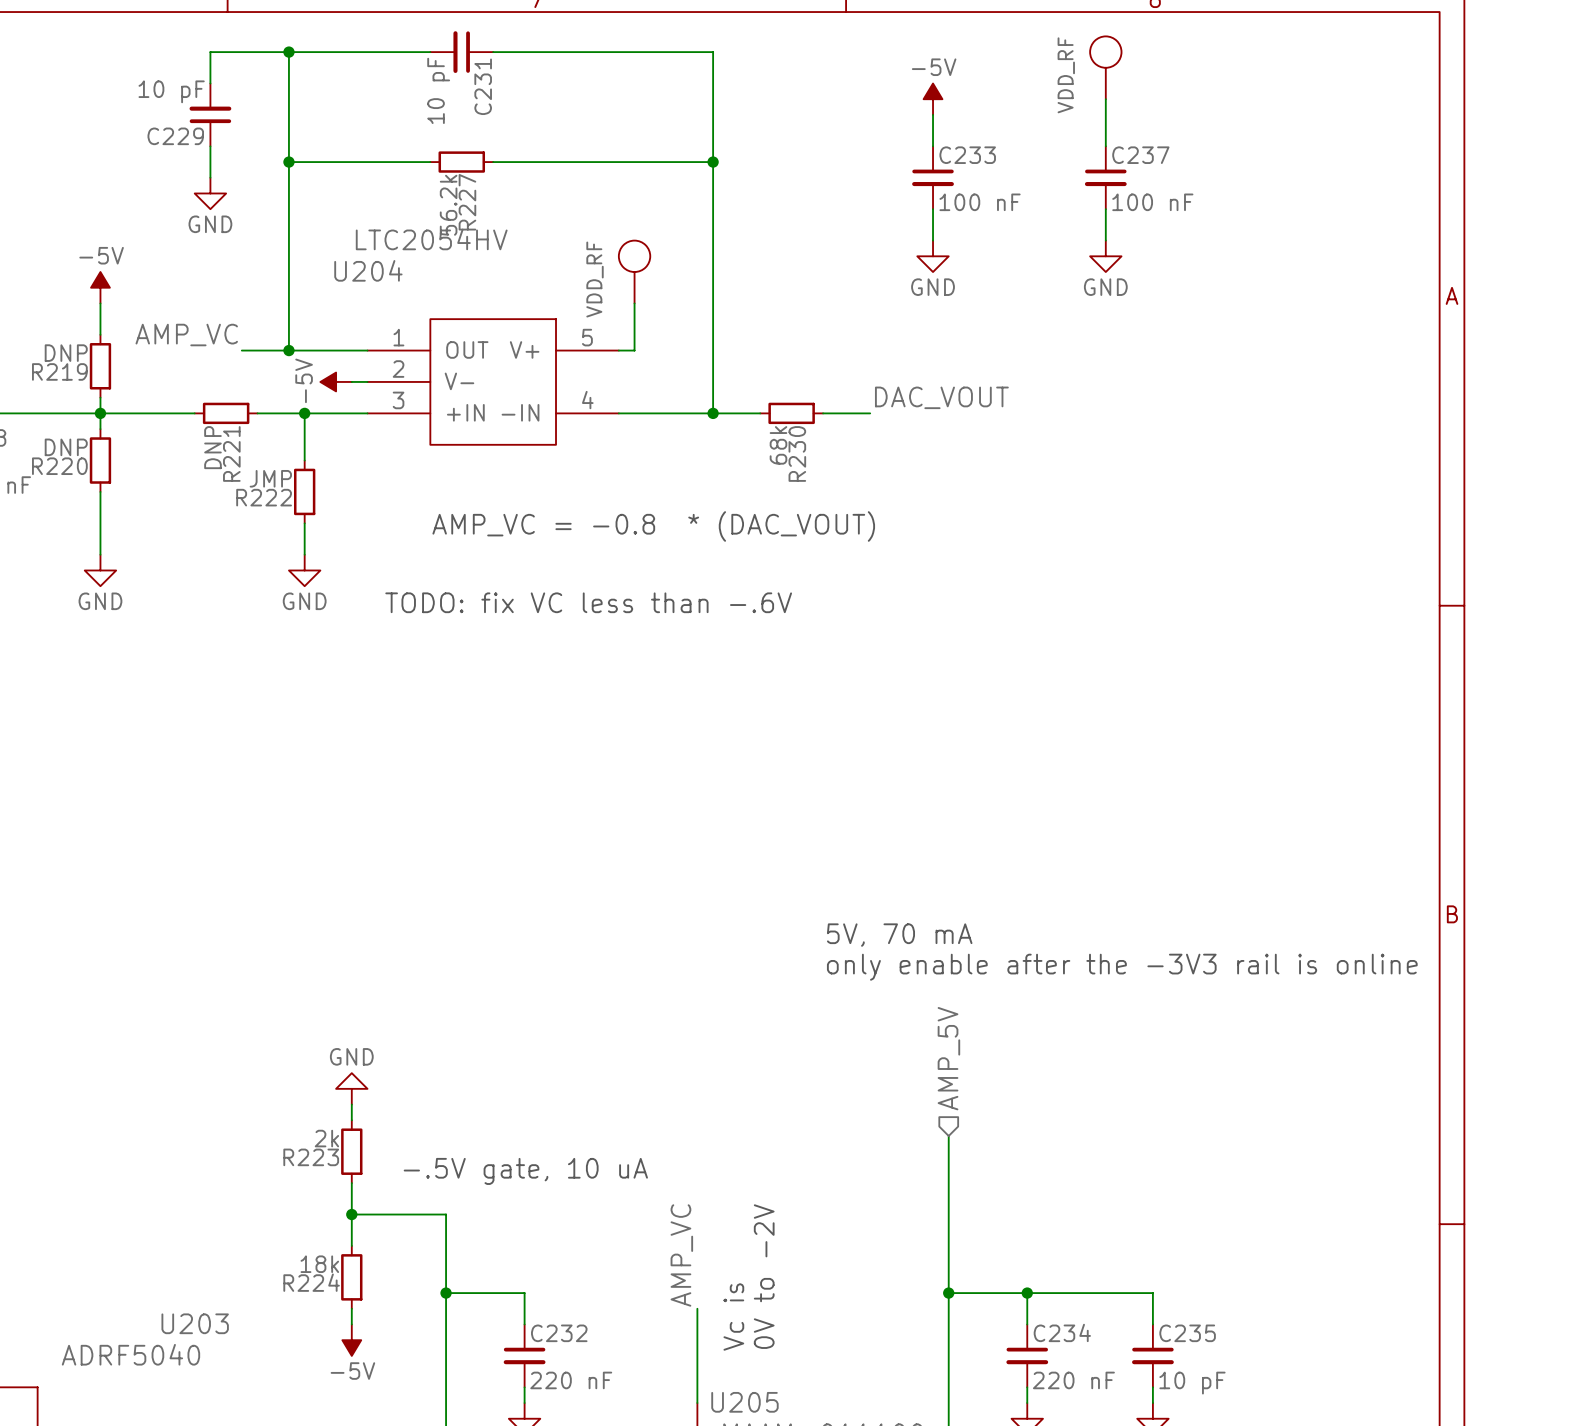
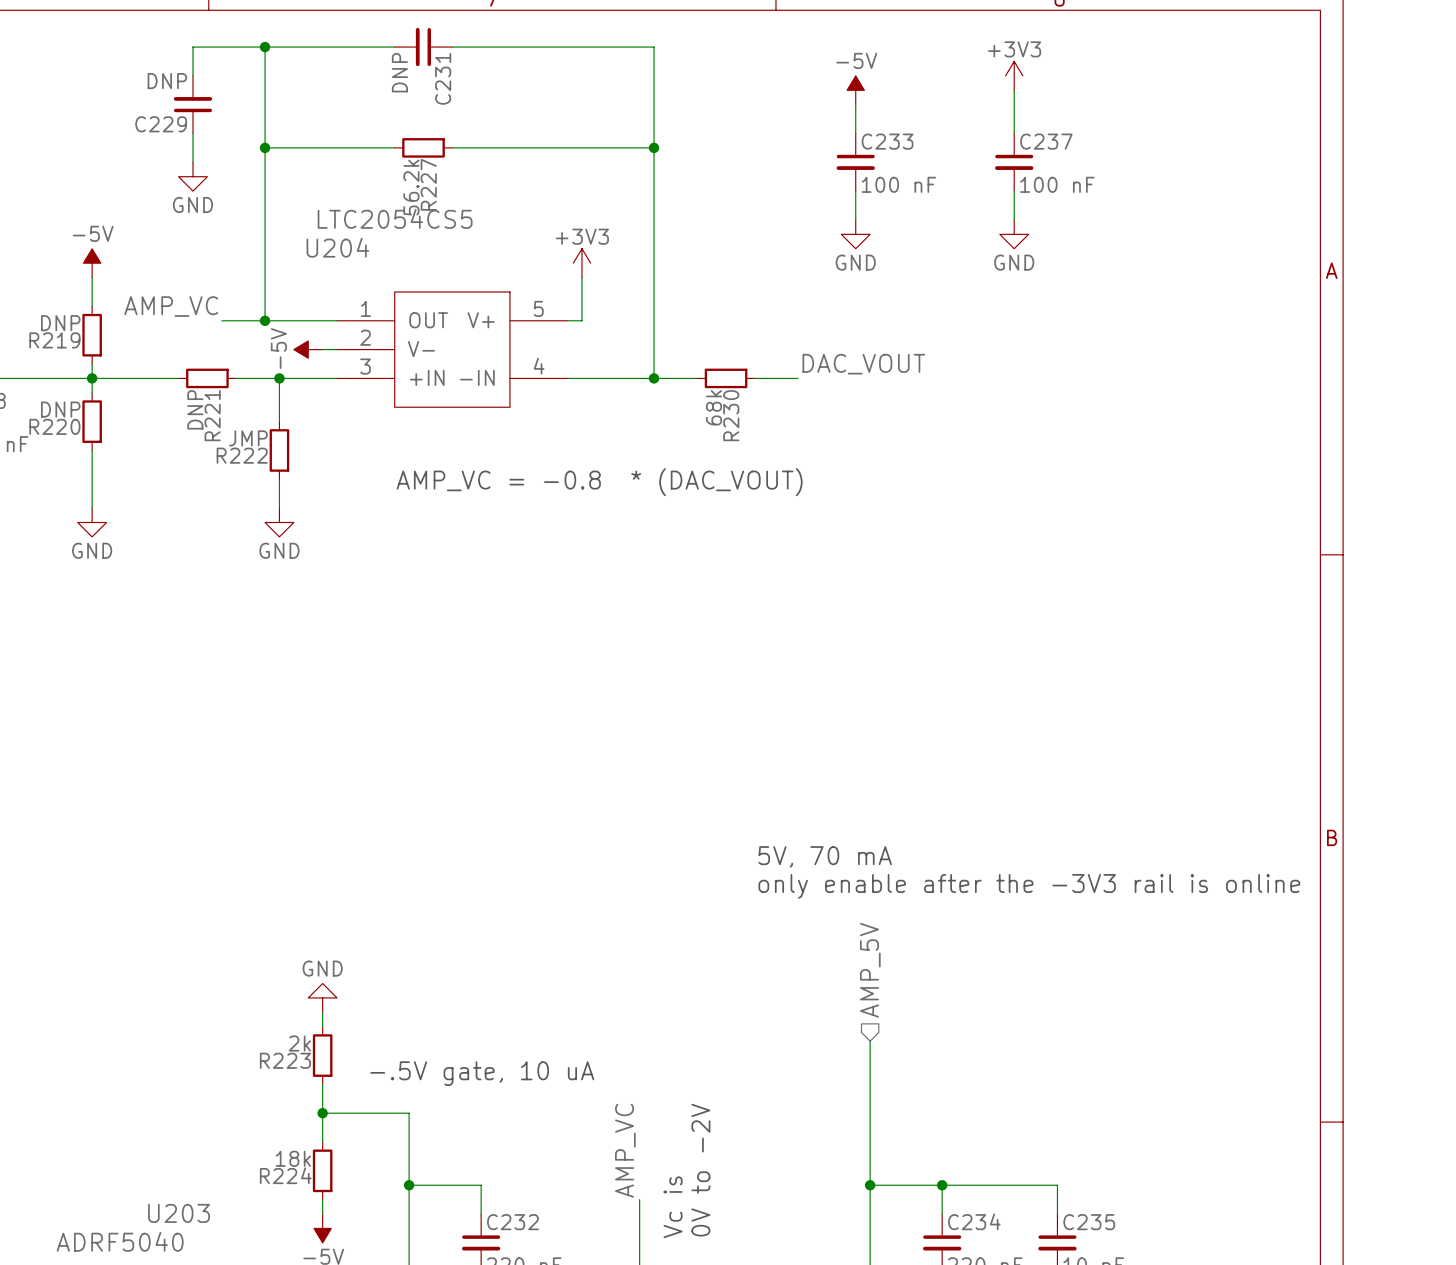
power symbol: VDD_RF (1105, 67) -> none
power symbol: none -> +3V3 (1014, 75)
C231 value: 10 pF (438, 90) -> DNP (399, 72)
C229 value: 10 pF (171, 91) -> DNP (167, 81)
U204 value: LTC2054HV (431, 239) -> LTC2054CS5 (395, 218)
power symbol: VDD_RF (634, 272) -> none
power symbol: none -> +3V3 (581, 263)
text: TODO: fix VC less than -.6V (588, 602) -> none

